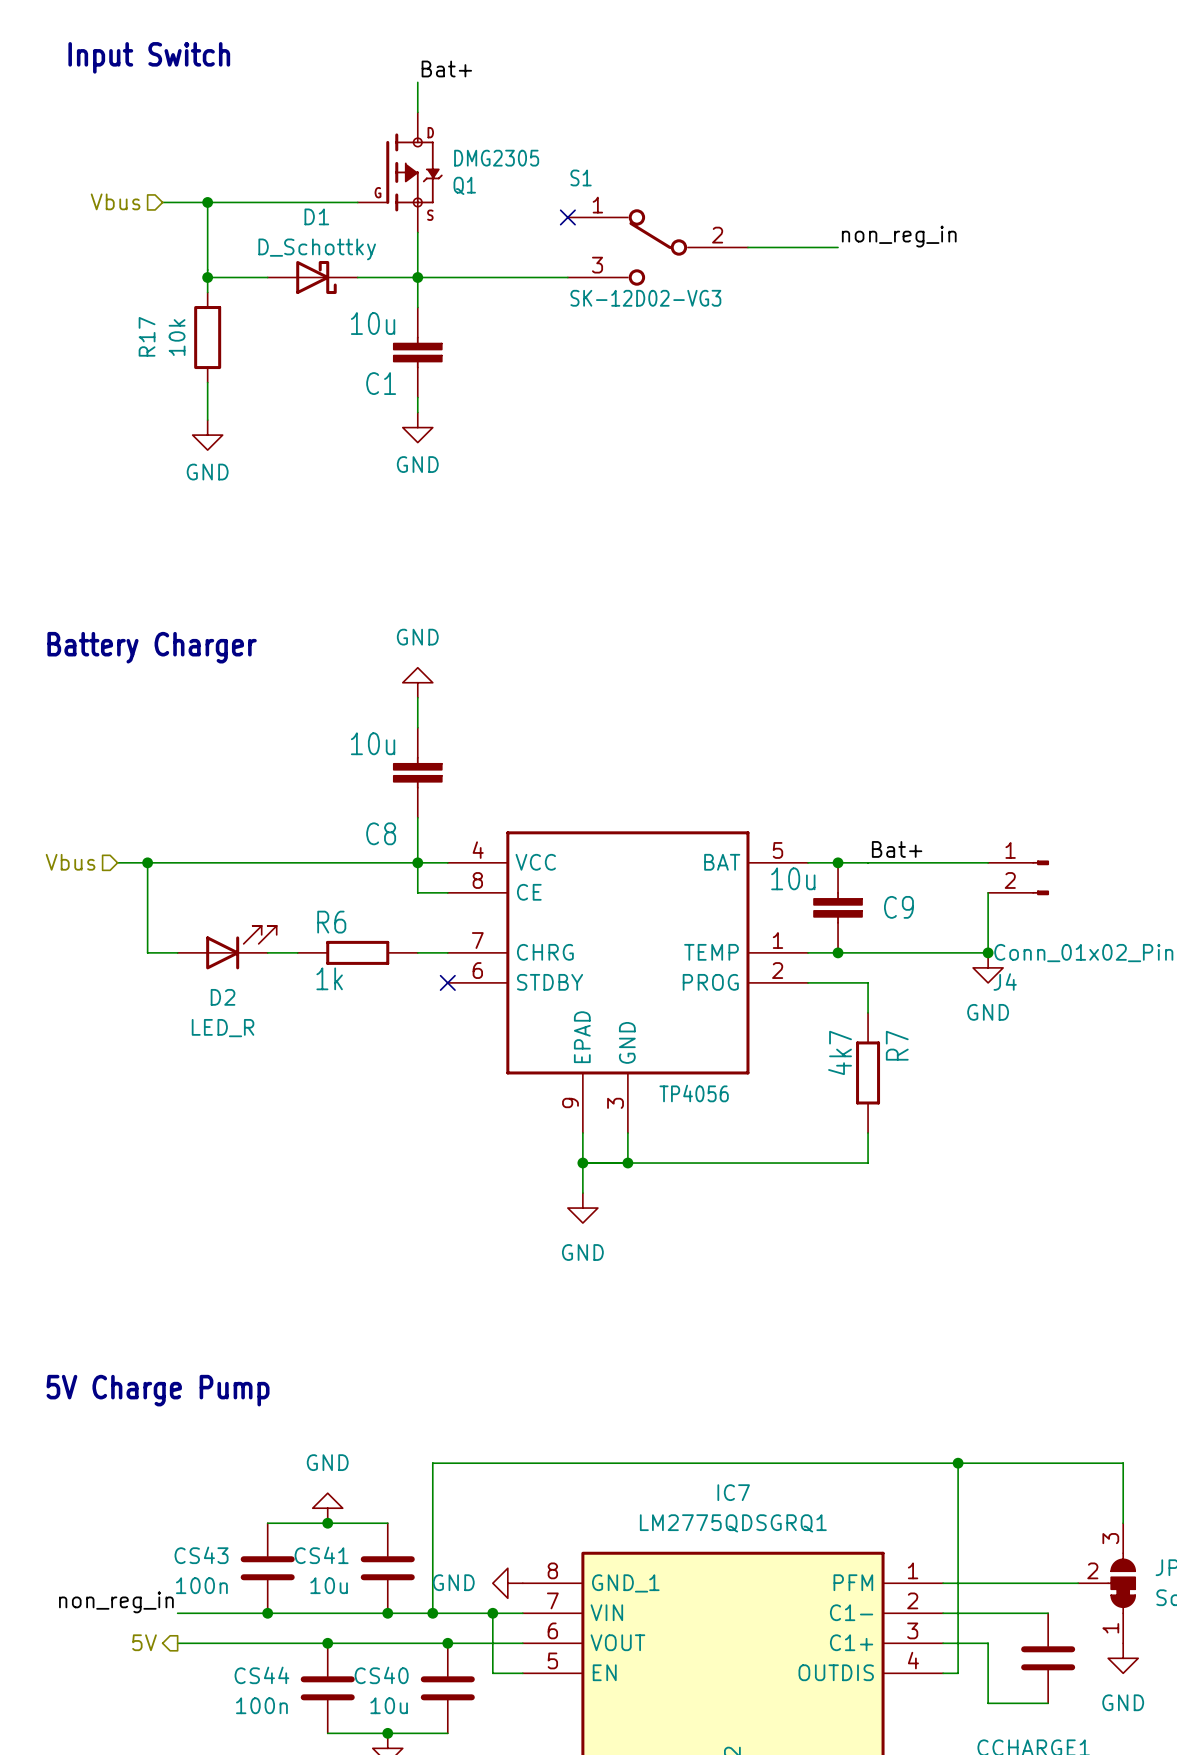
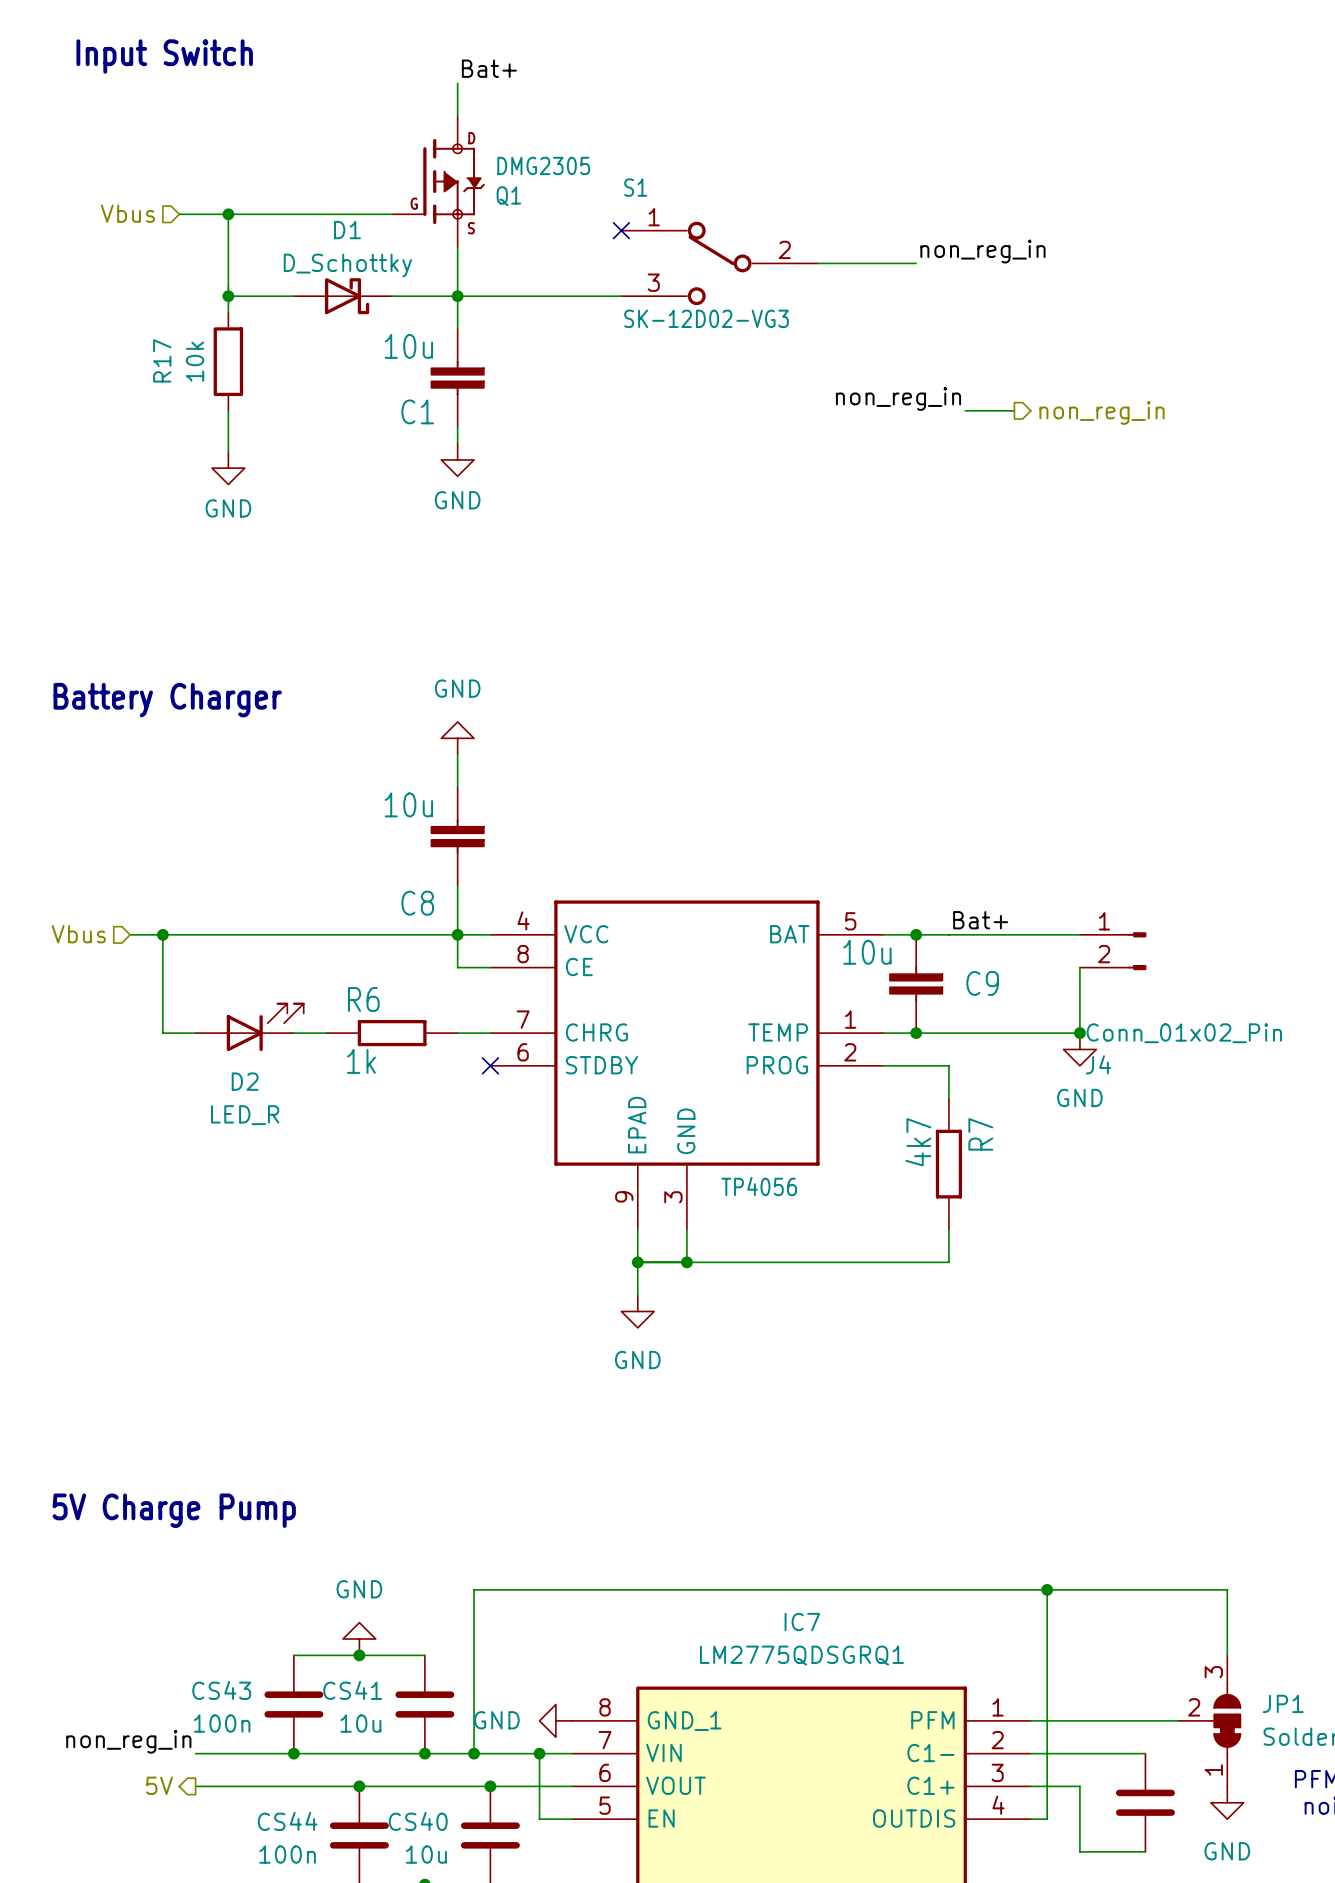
label: none -> non_reg_in (898, 398)
wire: none -> (965, 410) (1014, 410)
hierarchical label: none -> non_reg_in (1102, 412)

